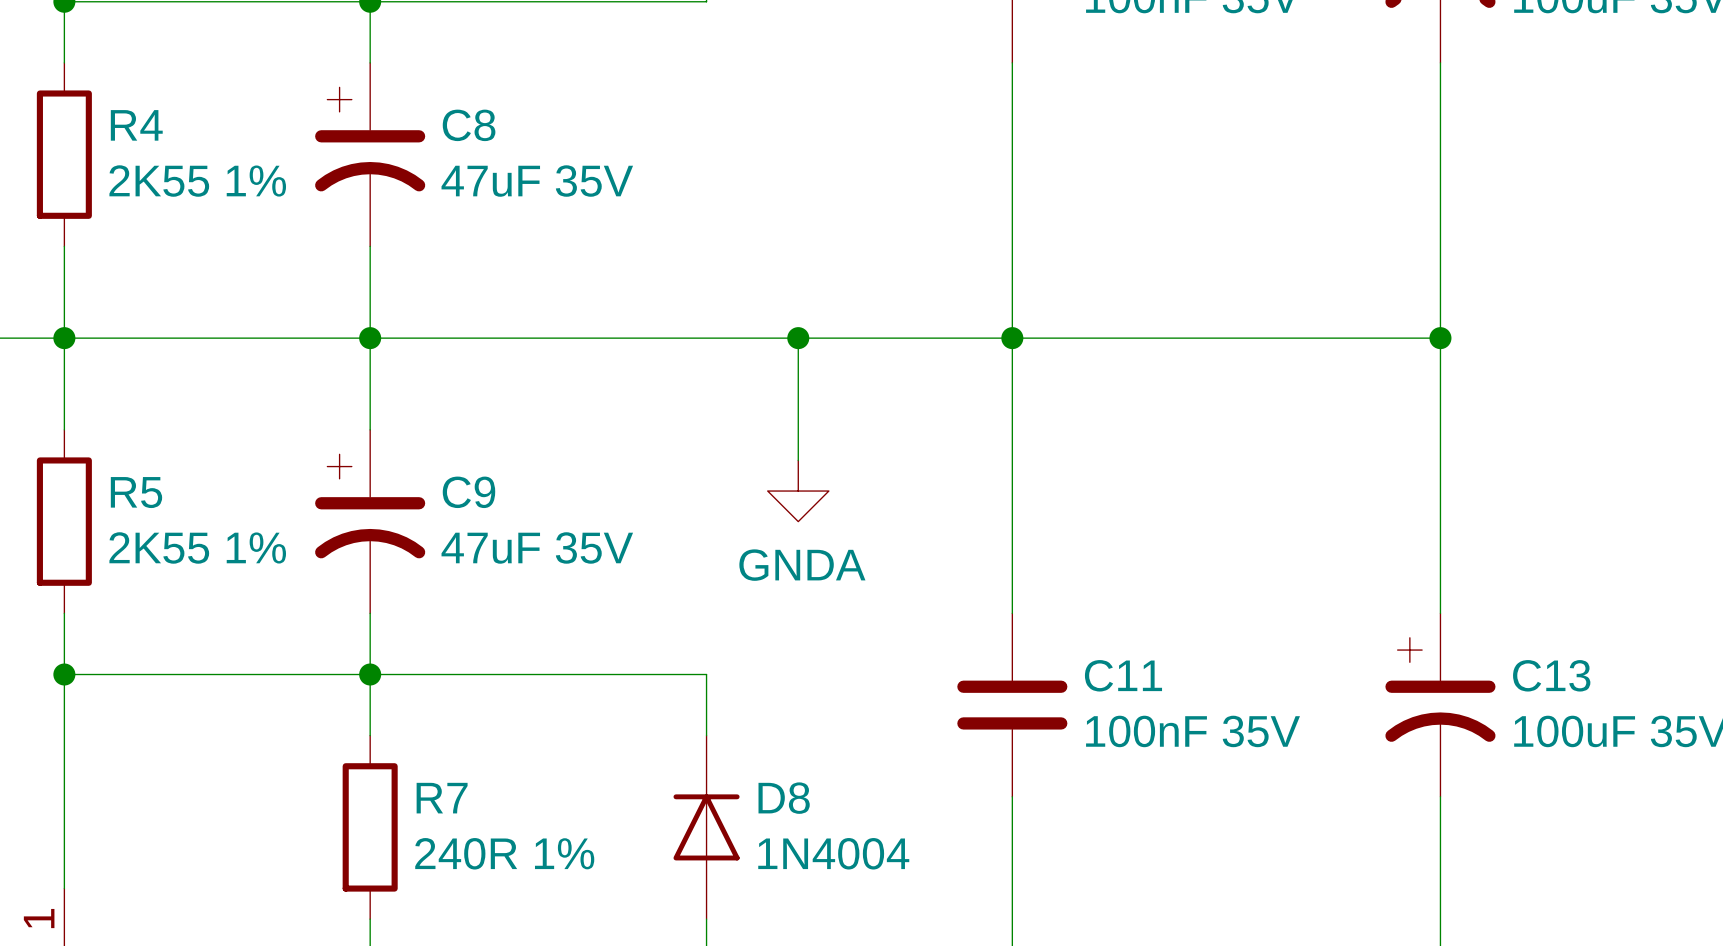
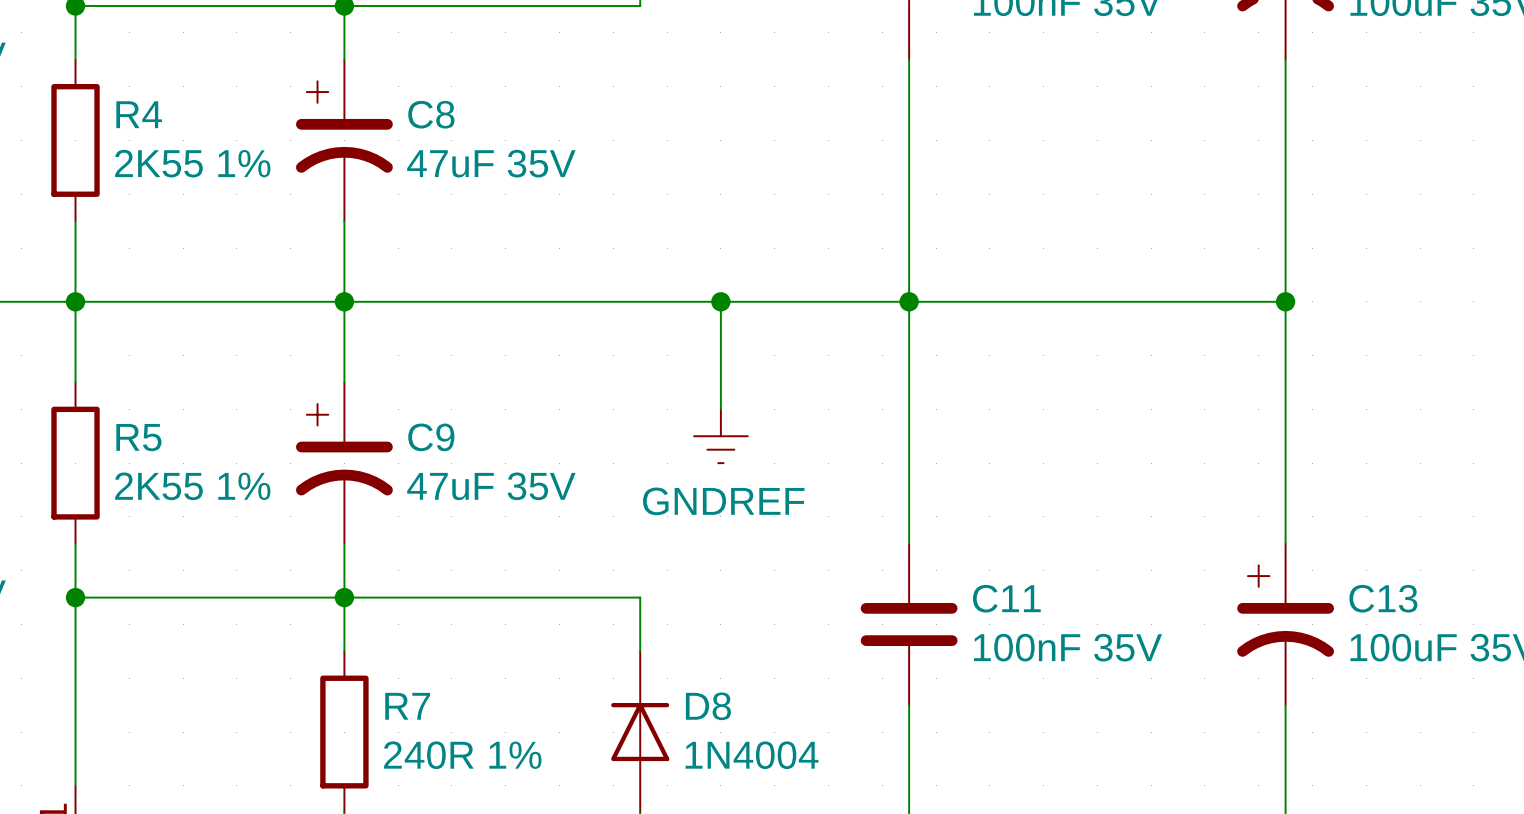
power symbol: GNDA (798, 491) -> GNDREF (720, 436)

